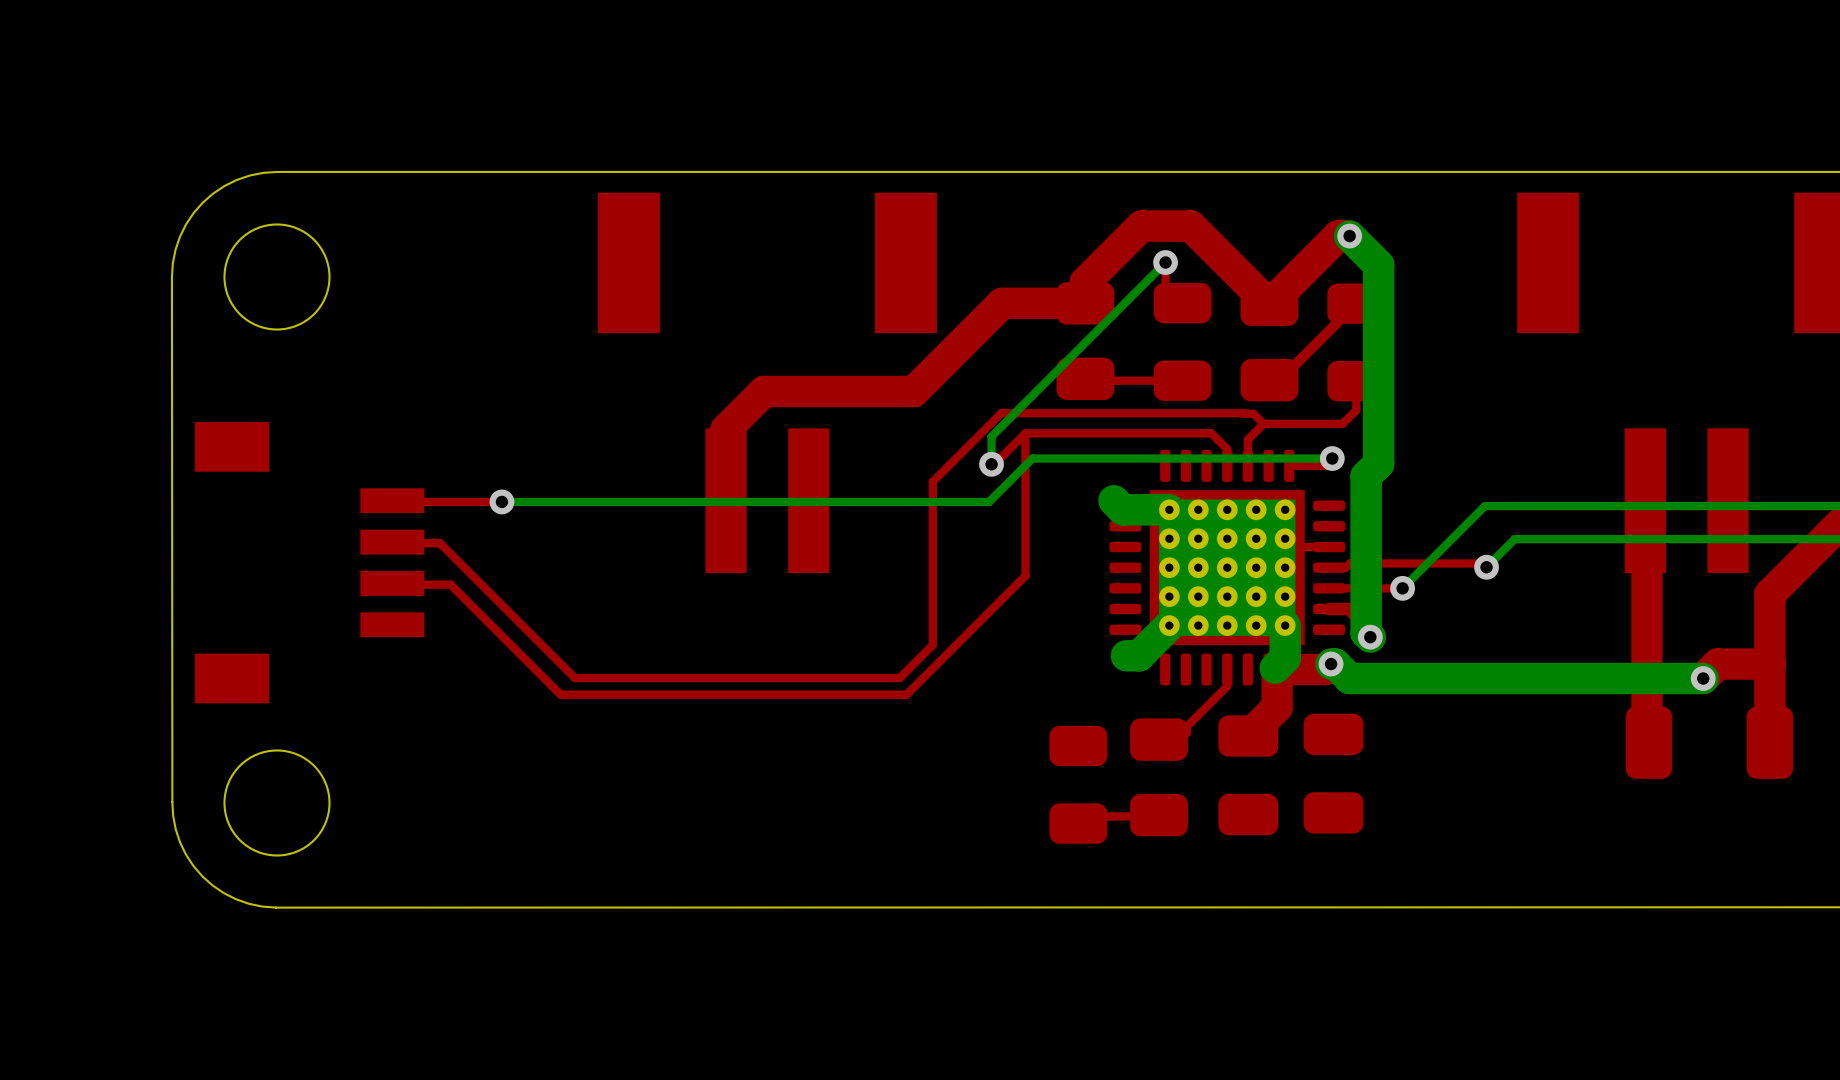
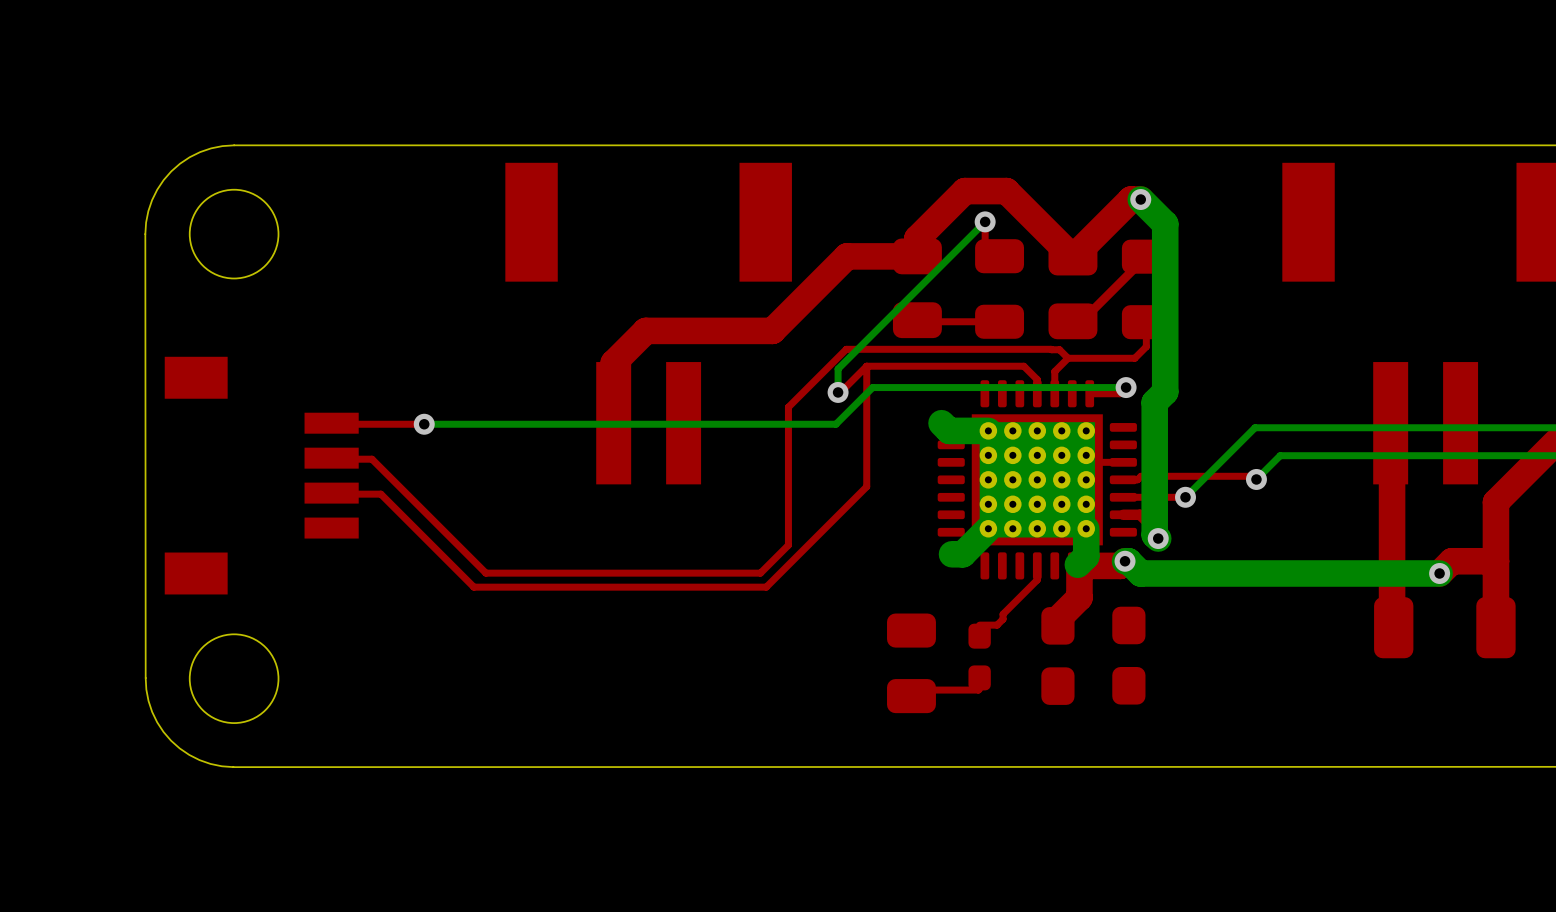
part footprint: [1303, 713, 1364, 834] -> [1112, 606, 1146, 705]
part footprint: [1218, 715, 1279, 836] -> [1041, 607, 1075, 705]
part footprint: [1130, 718, 1188, 837] -> [968, 623, 991, 691]

